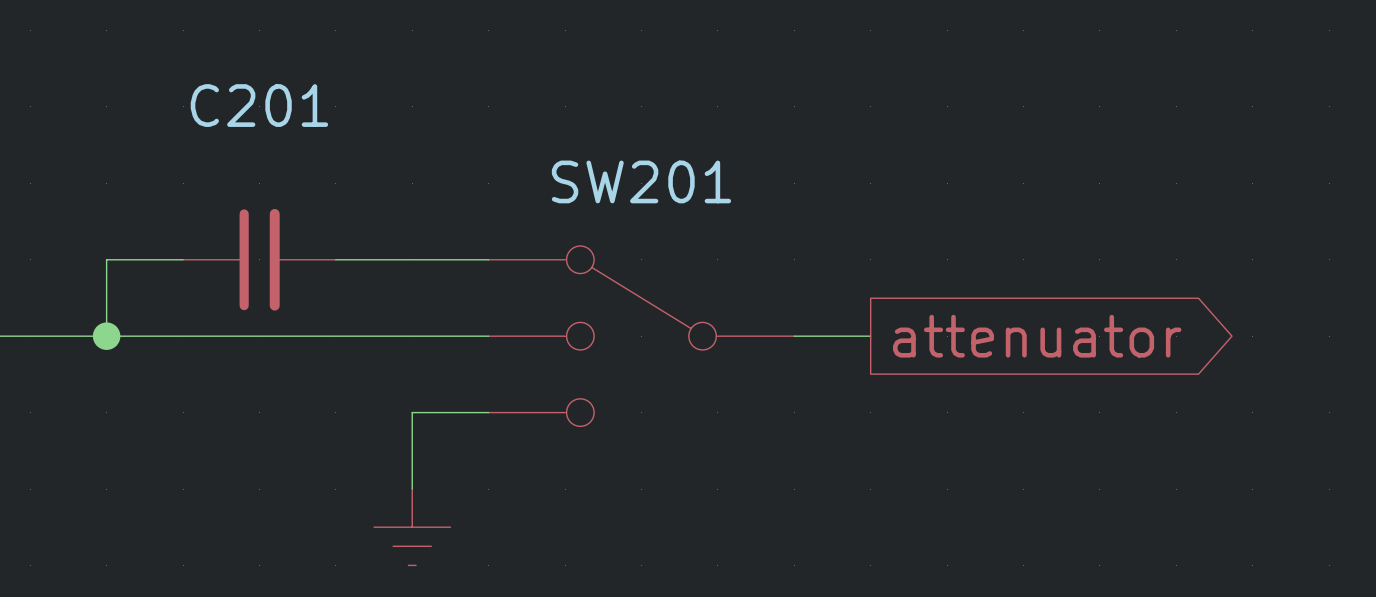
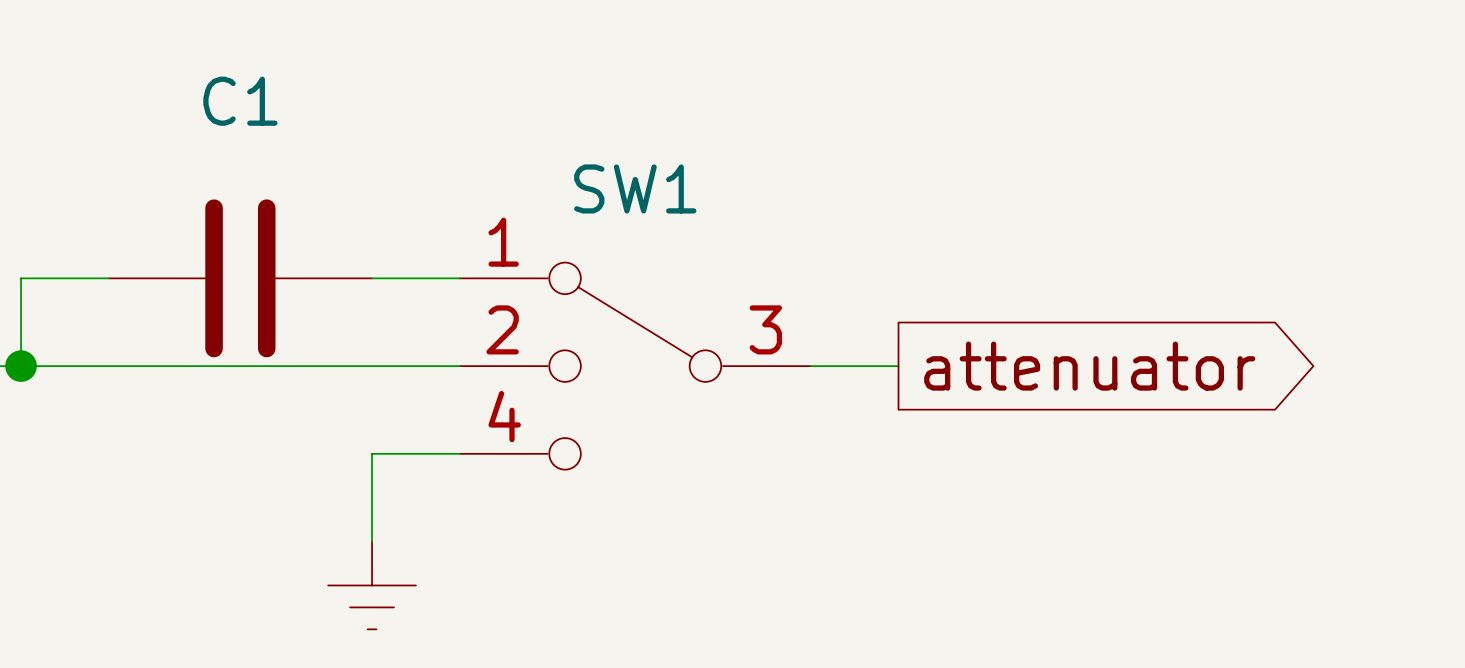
SW201 name: SW201 (641, 181) -> SW1 (635, 188)
SW201 pin number: none -> 1 (503, 242)
C201: (259, 259) -> none
C1: none -> (240, 278)
SW201 pin number: none -> 2 (502, 329)
SW201 pin number: none -> 3 (765, 329)
SW201 pin number: none -> 4 (504, 416)

